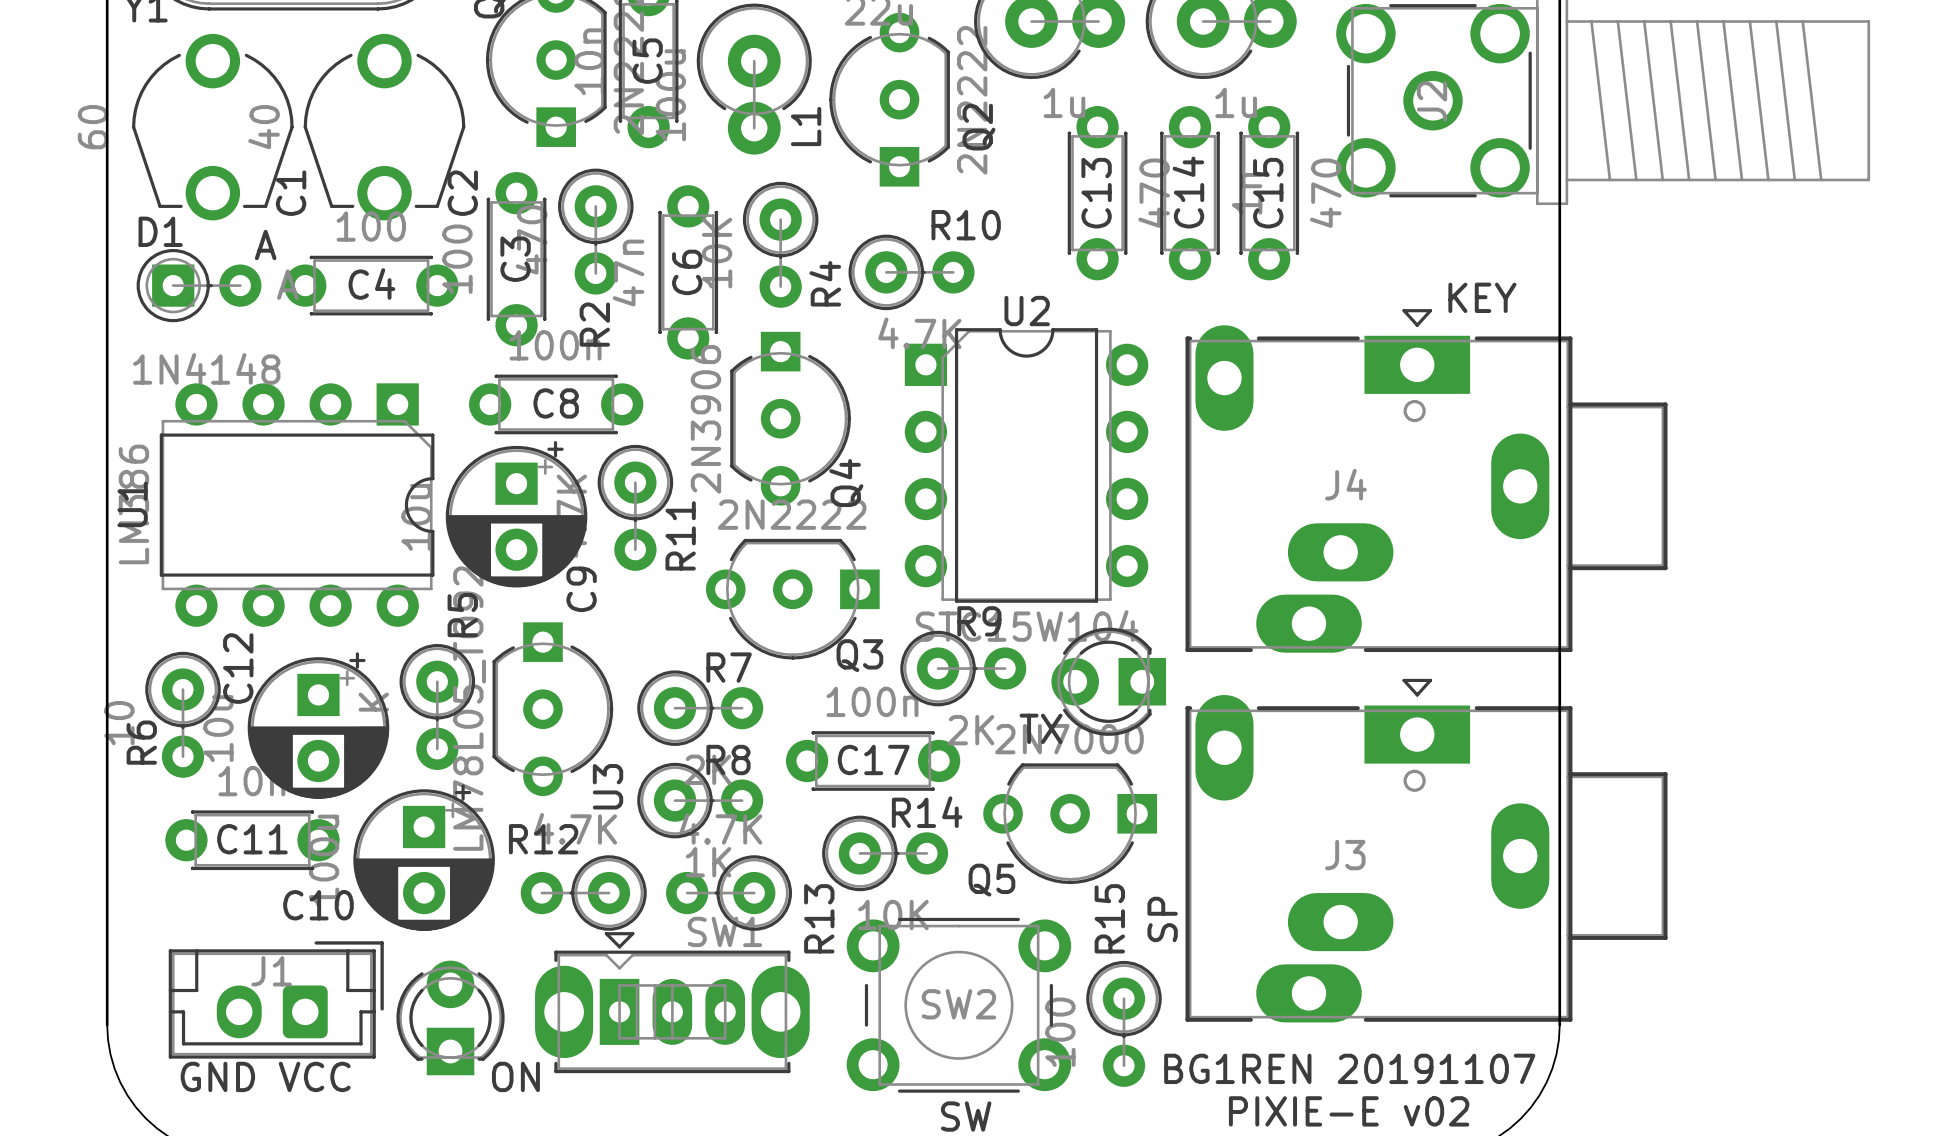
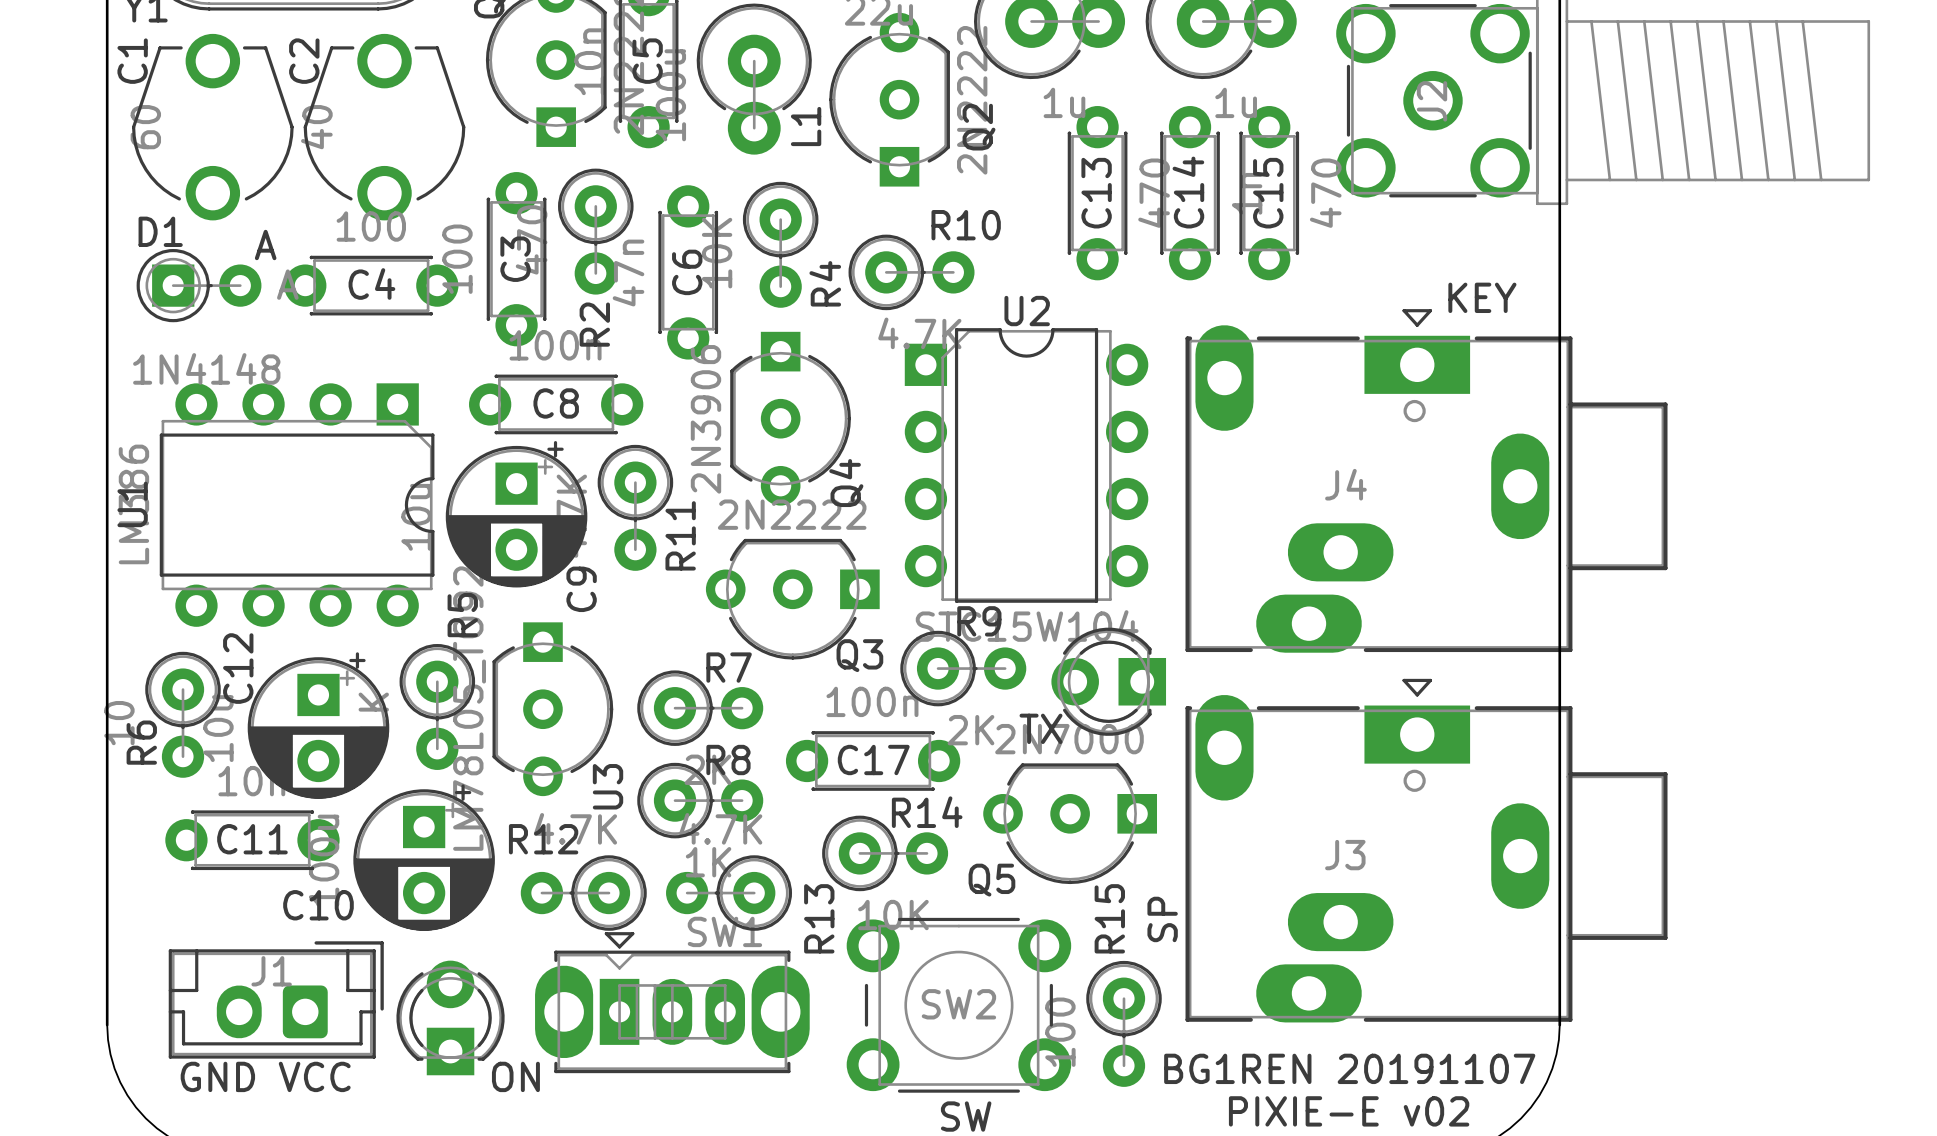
C1 rotation: 0° (212, 127) -> 180° (212, 127)
C2 rotation: 0° (384, 127) -> 180° (384, 127)

